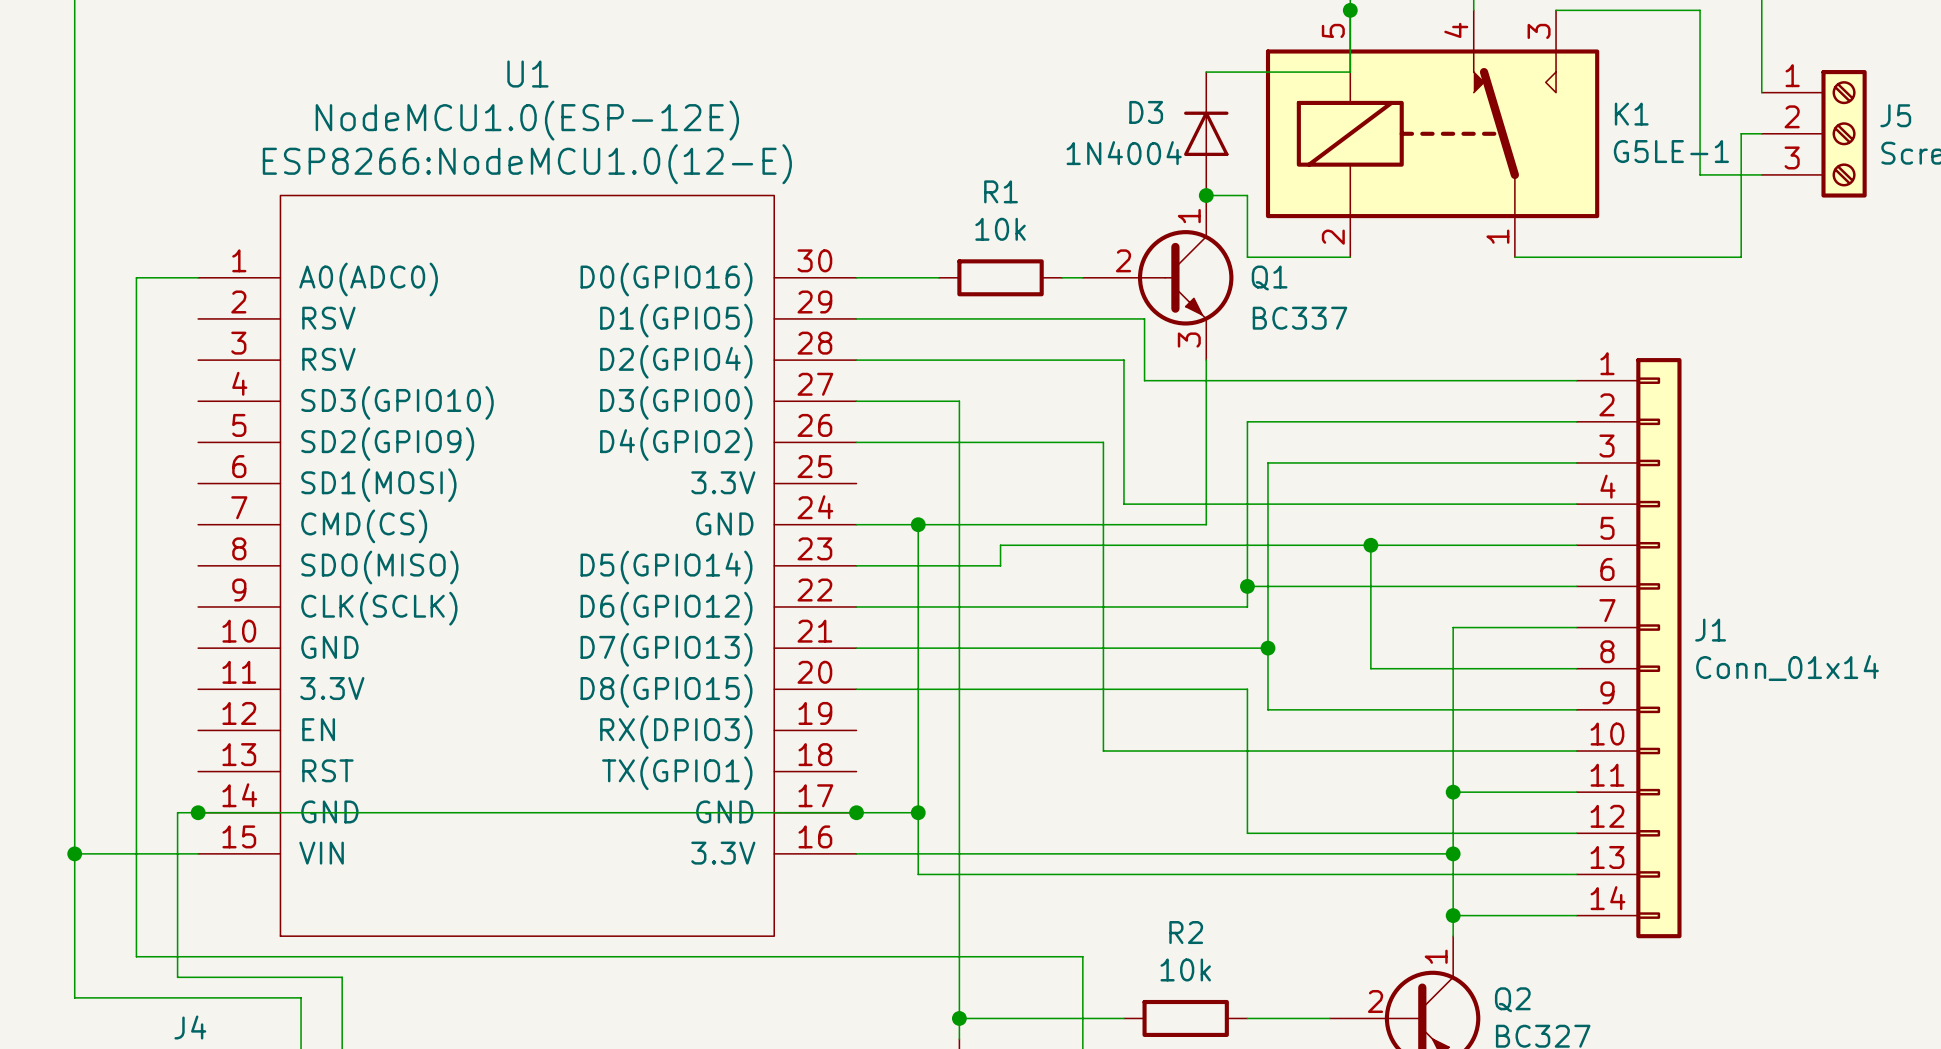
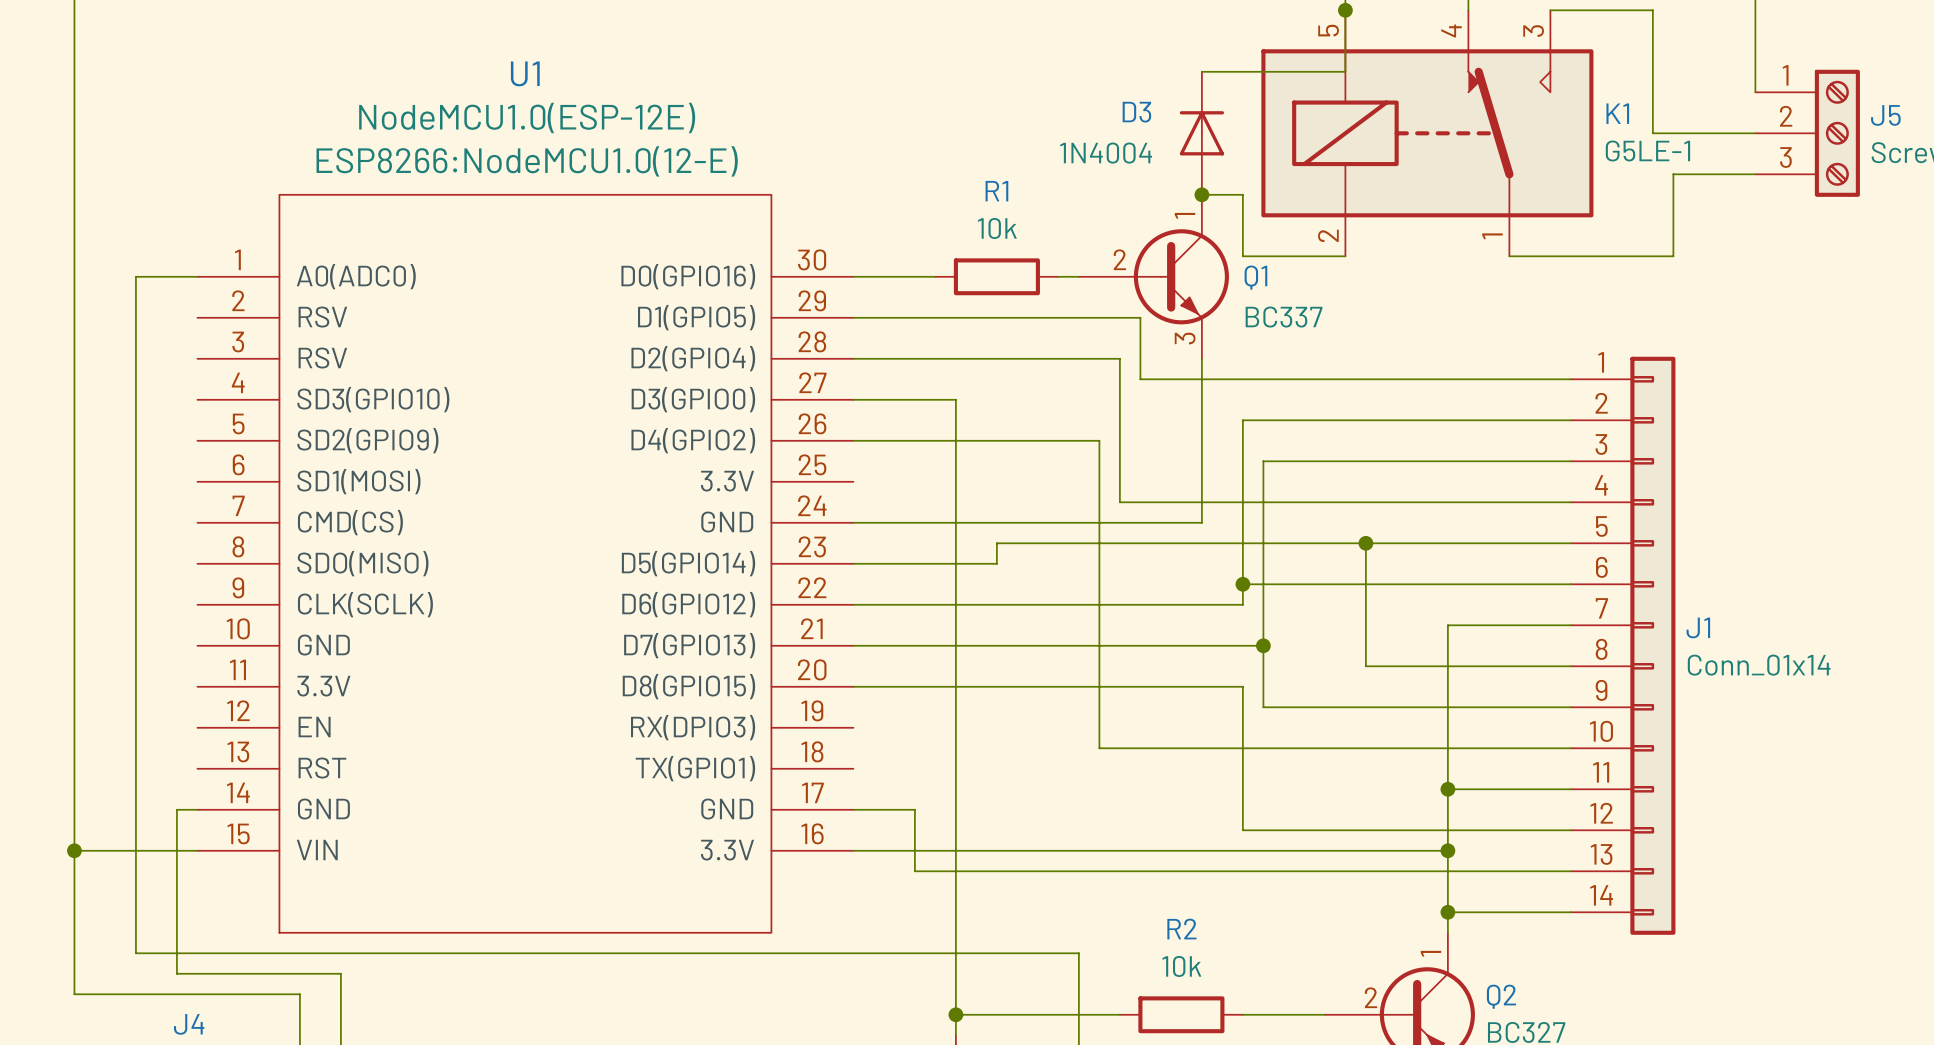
wire: (1658, 10) (1700, 10) (1700, 174) -> (1652, 10) (1652, 133) (1734, 133)
wire: (1741, 133) (1741, 257) (1679, 257) -> (1693, 174) (1673, 174) (1673, 256)
wire: (918, 524) (918, 812) -> none
junction: (918, 524) -> none
wire: (198, 812) (856, 812) -> none
junction: (198, 812) -> none
junction: (856, 812) -> none
junction: (918, 812) -> none

